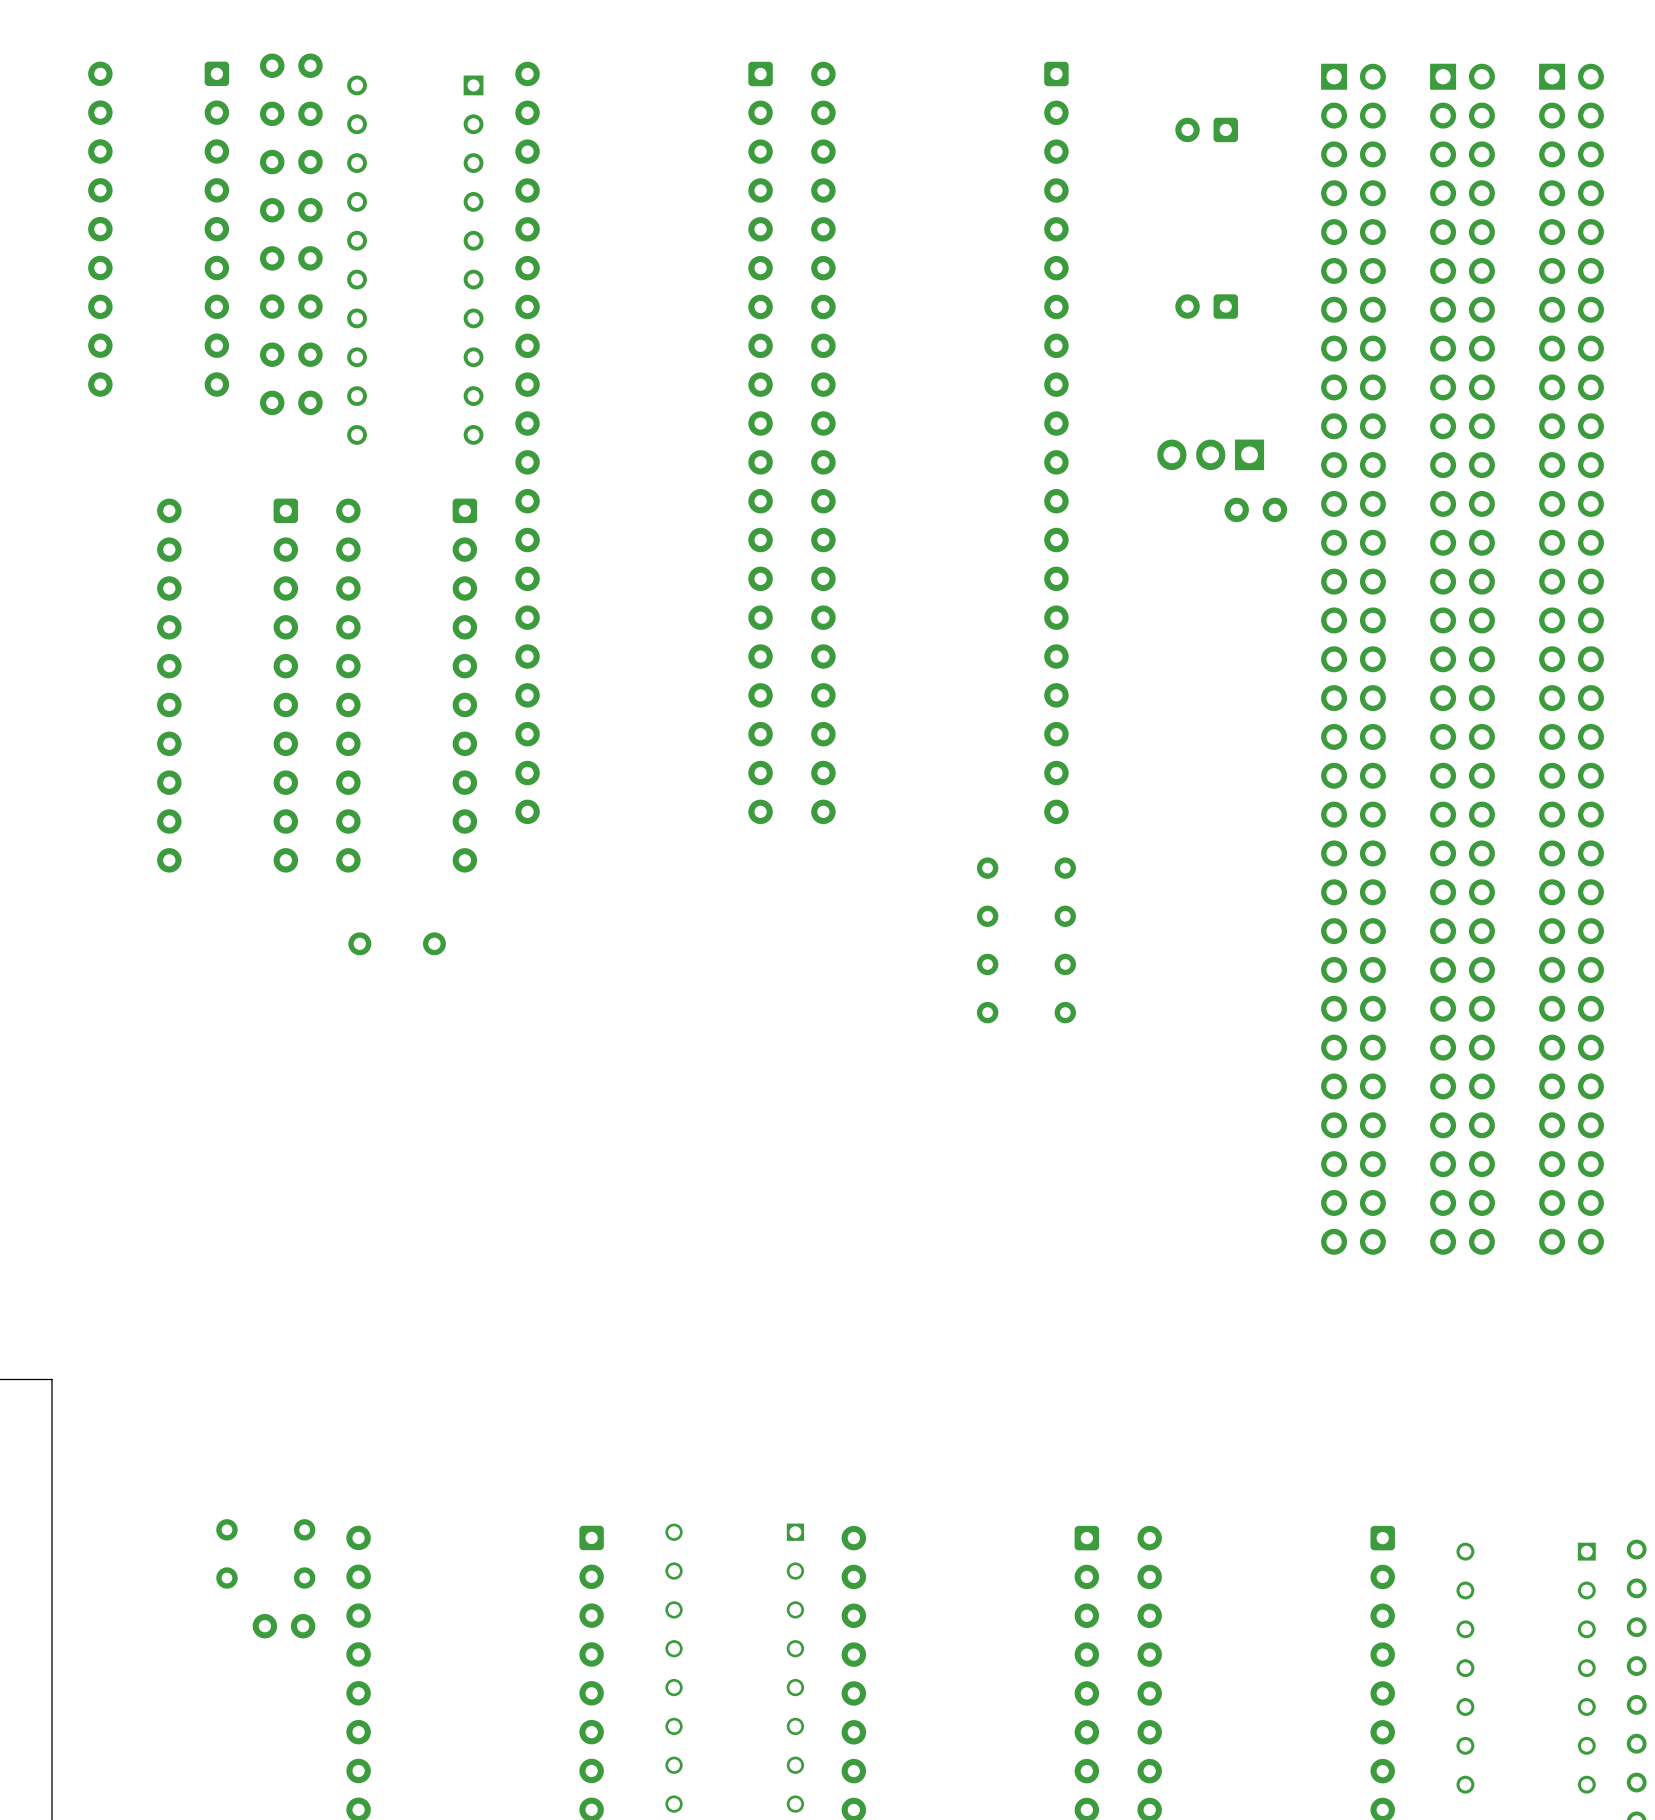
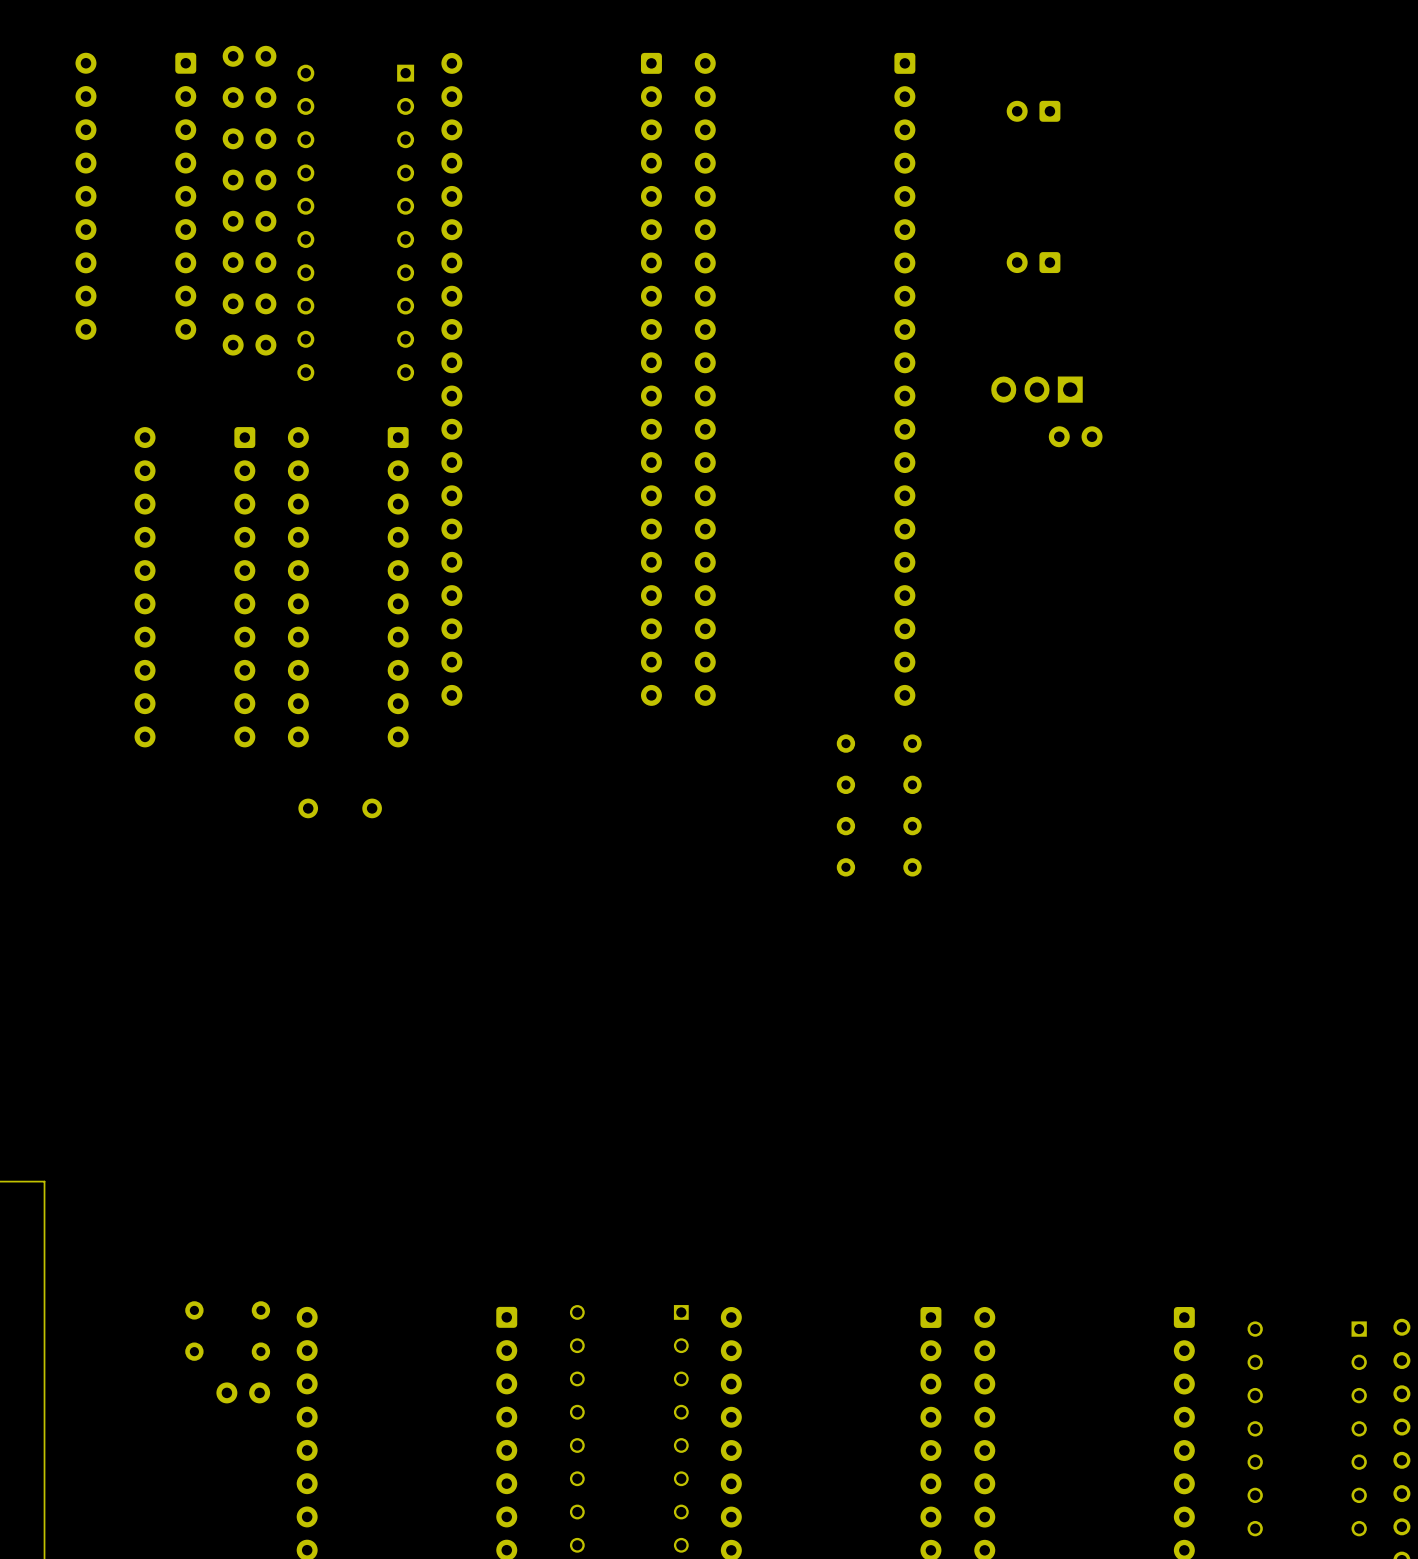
part: (1353, 659) -> none
part: (1462, 659) -> none
part: (1571, 659) -> none

